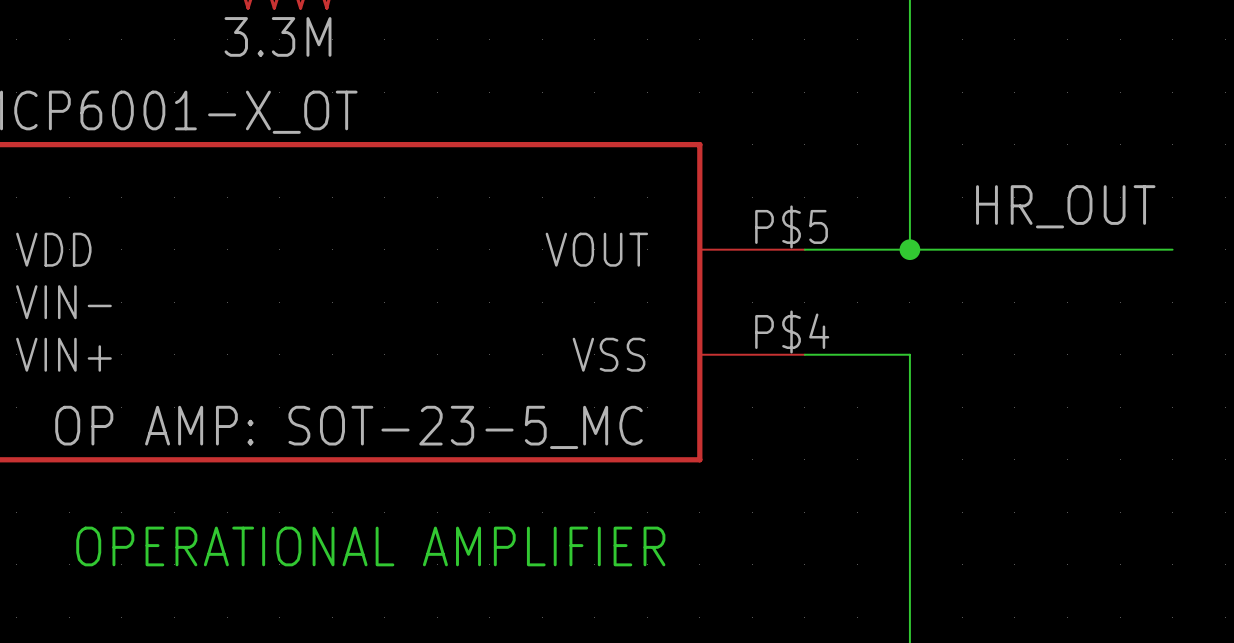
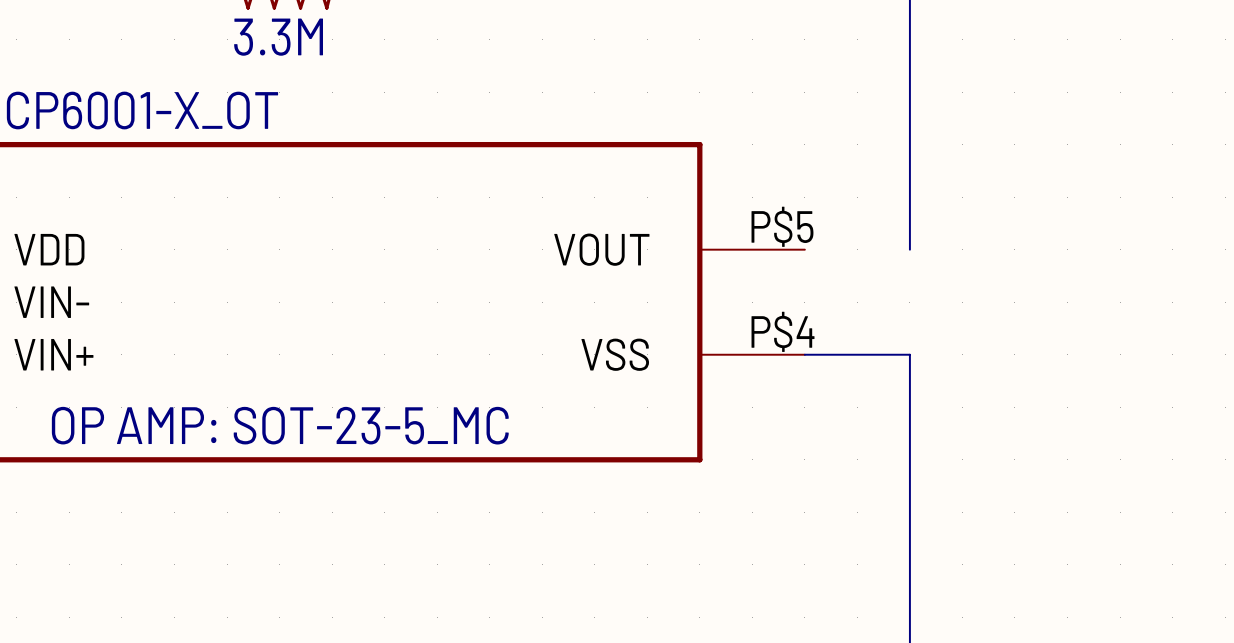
label: HR_OUT (1065, 206) -> none
wire: (804, 249) (1172, 249) -> none
junction: (909, 249) -> none
text: OPERATIONAL AMPLIFIER (370, 546) -> none

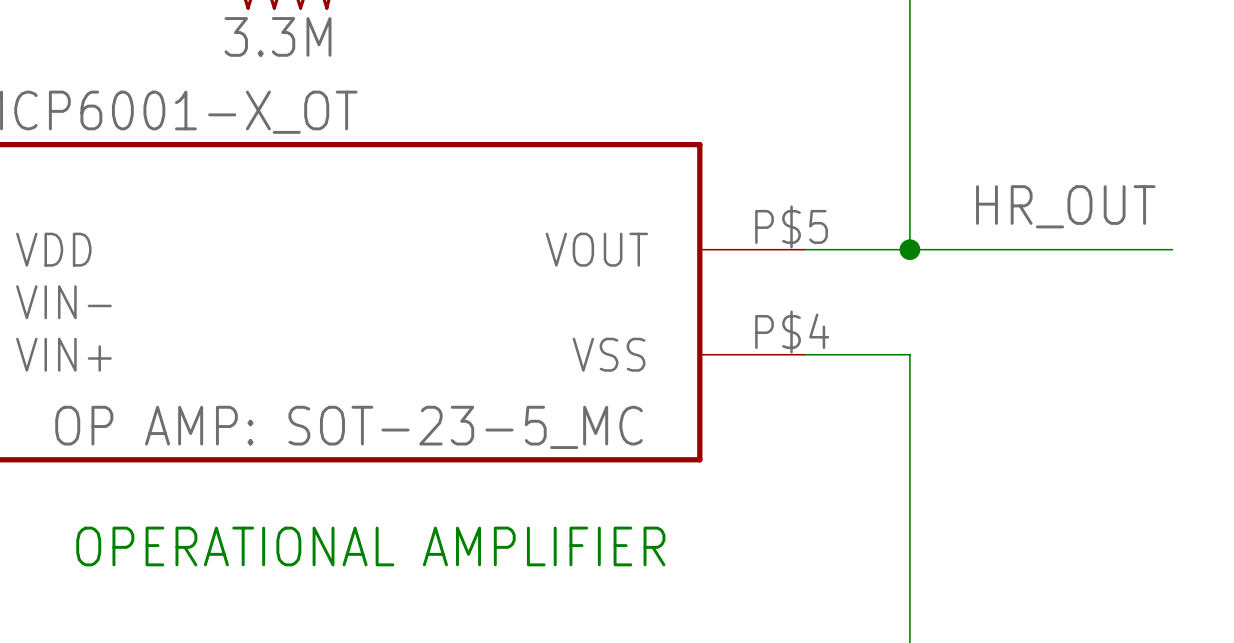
label: none -> HR_OUT (1065, 206)
wire: none -> (804, 249) (1172, 249)
junction: none -> (909, 249)
text: none -> OPERATIONAL AMPLIFIER (370, 546)

